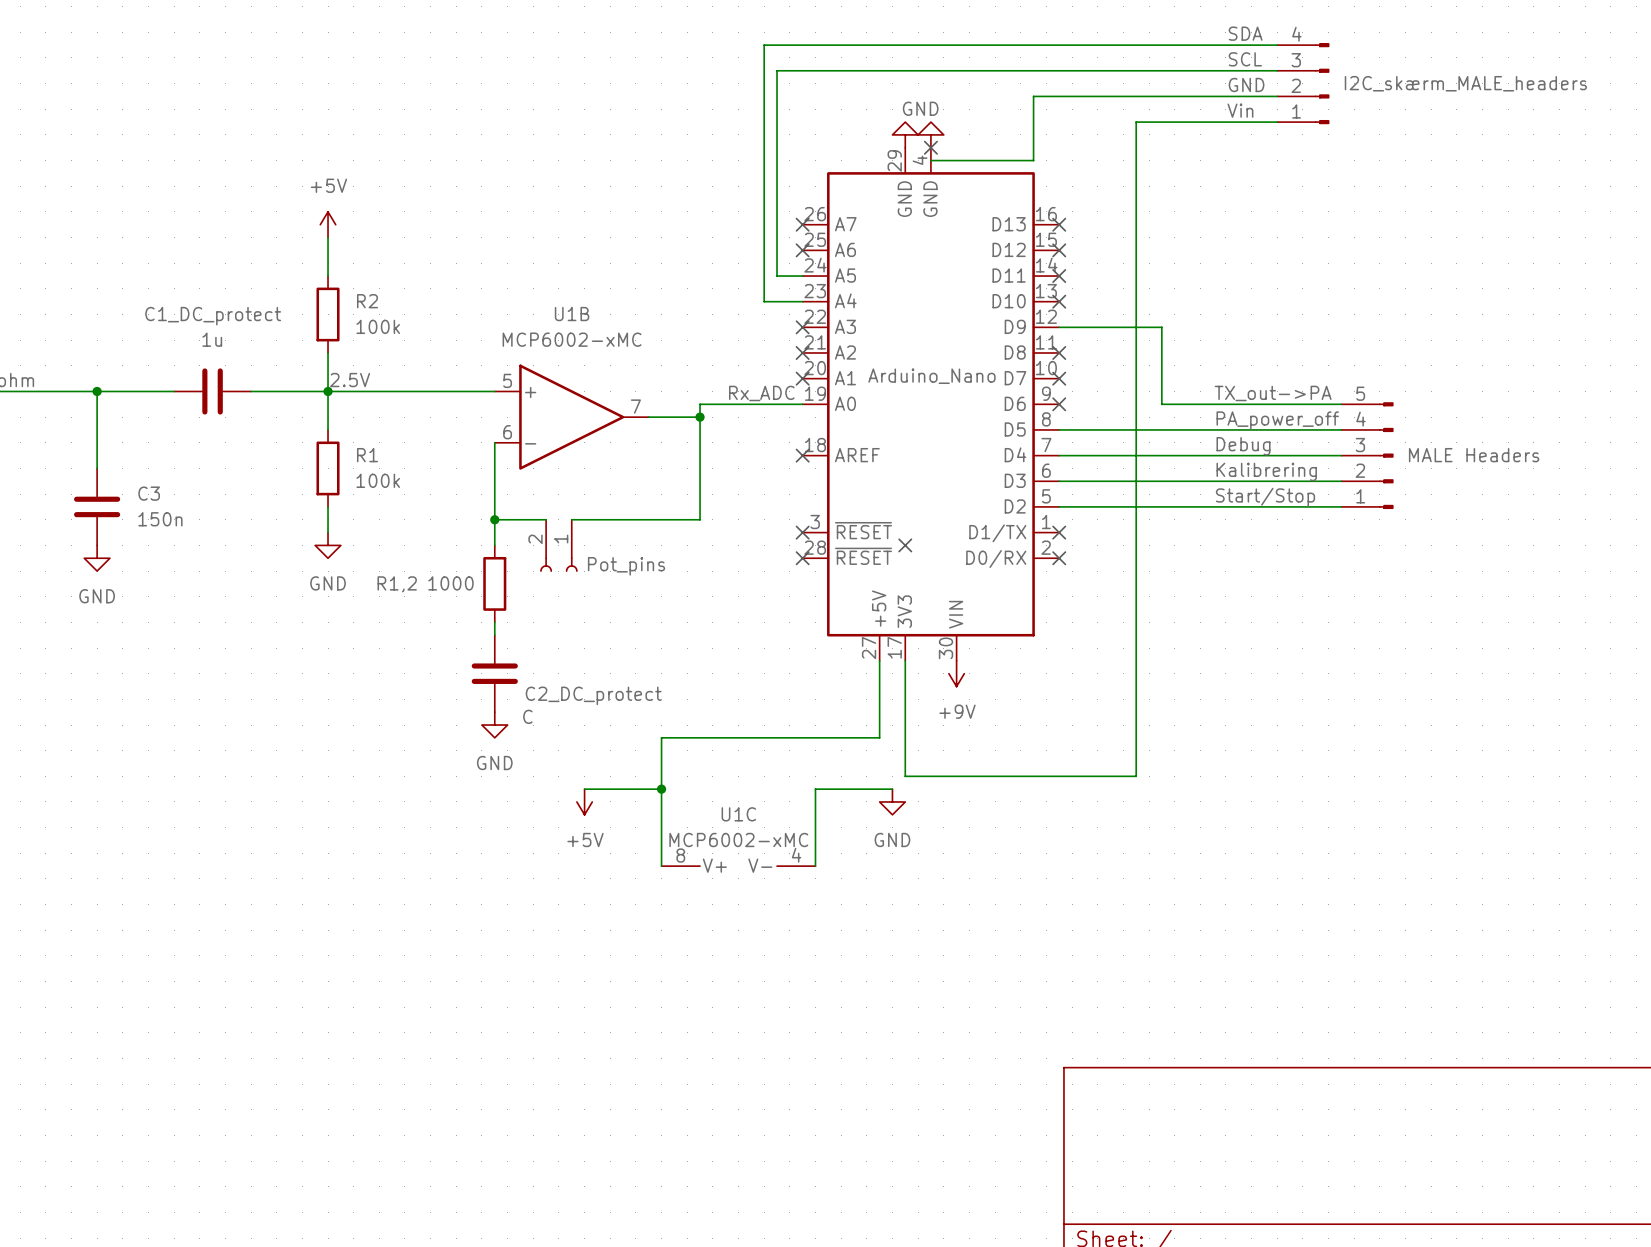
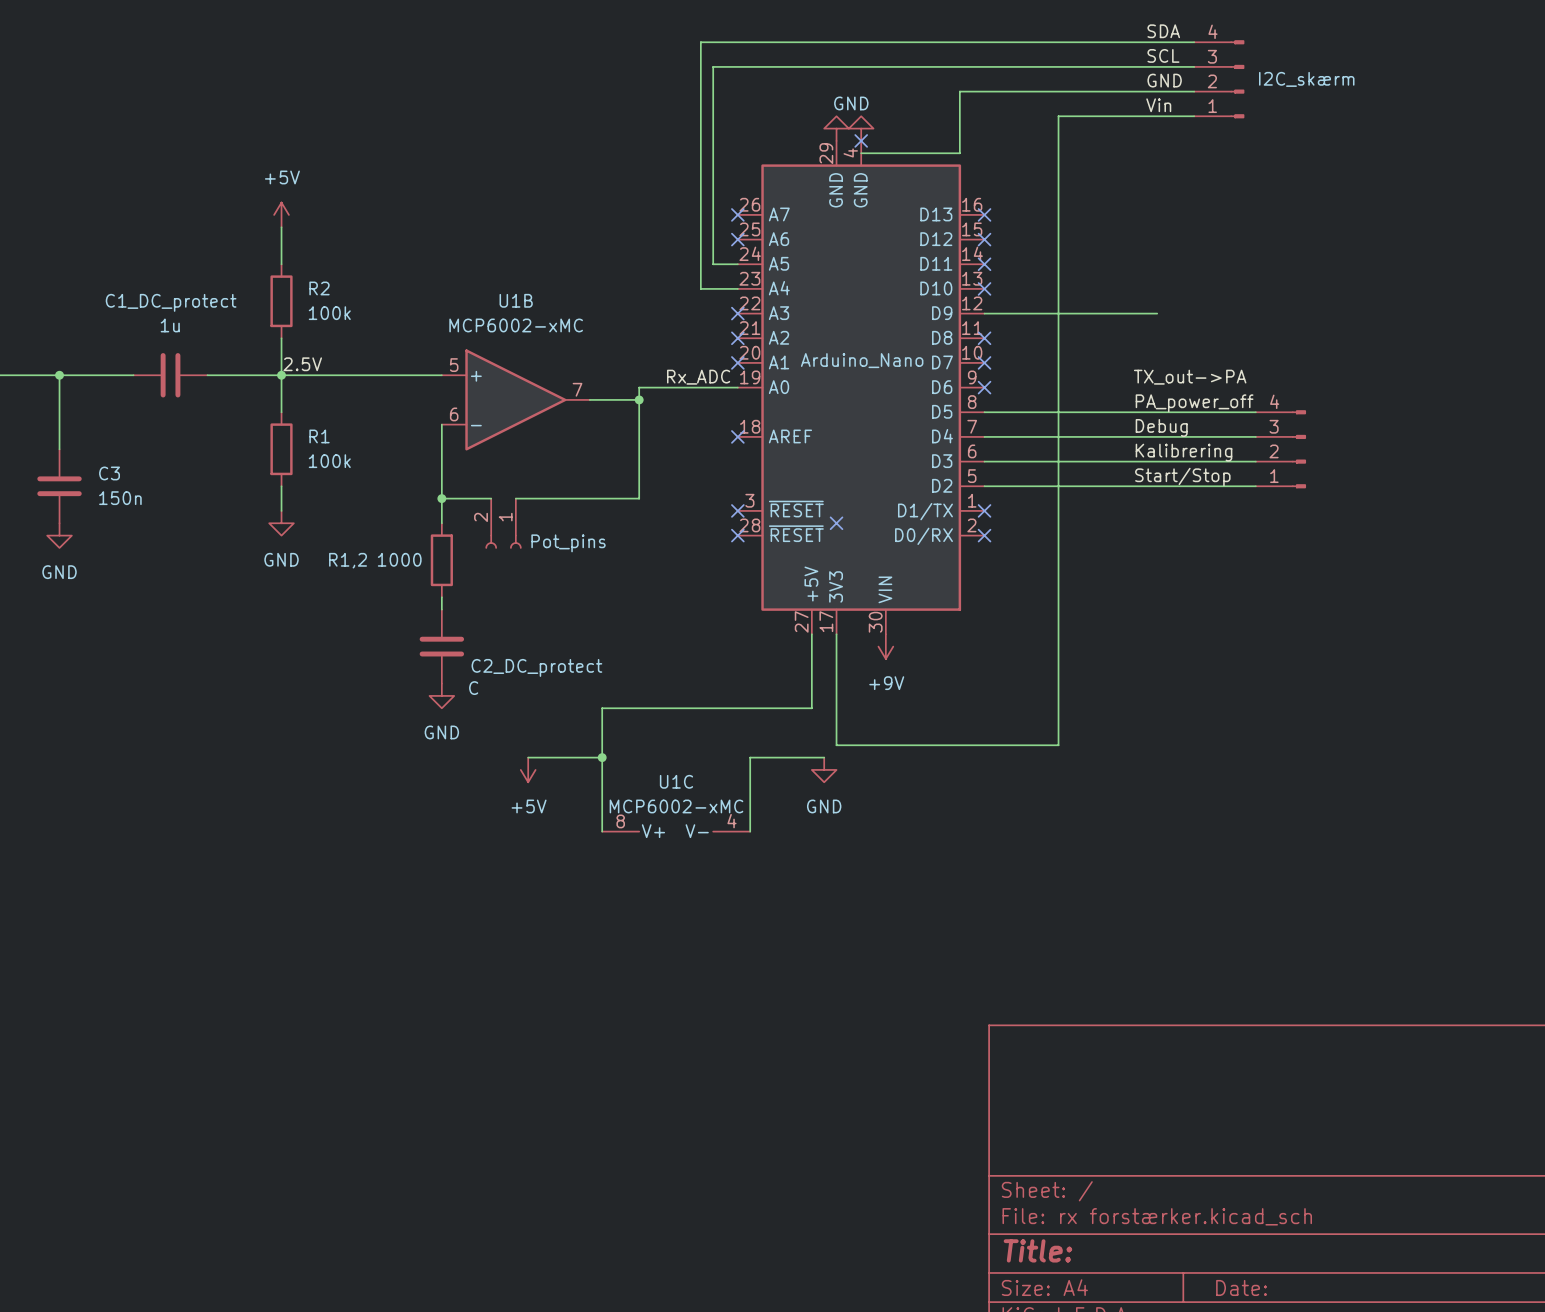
I2C_skærm_MALE_headers name: I2C_skærm_MALE_headers (1465, 83) -> I2C_skærm (1306, 79)
wire: (1161, 327) (1161, 404) (1341, 404) -> (1083, 313) (1157, 313)
part: MALE Headers (1367, 455) -> none

